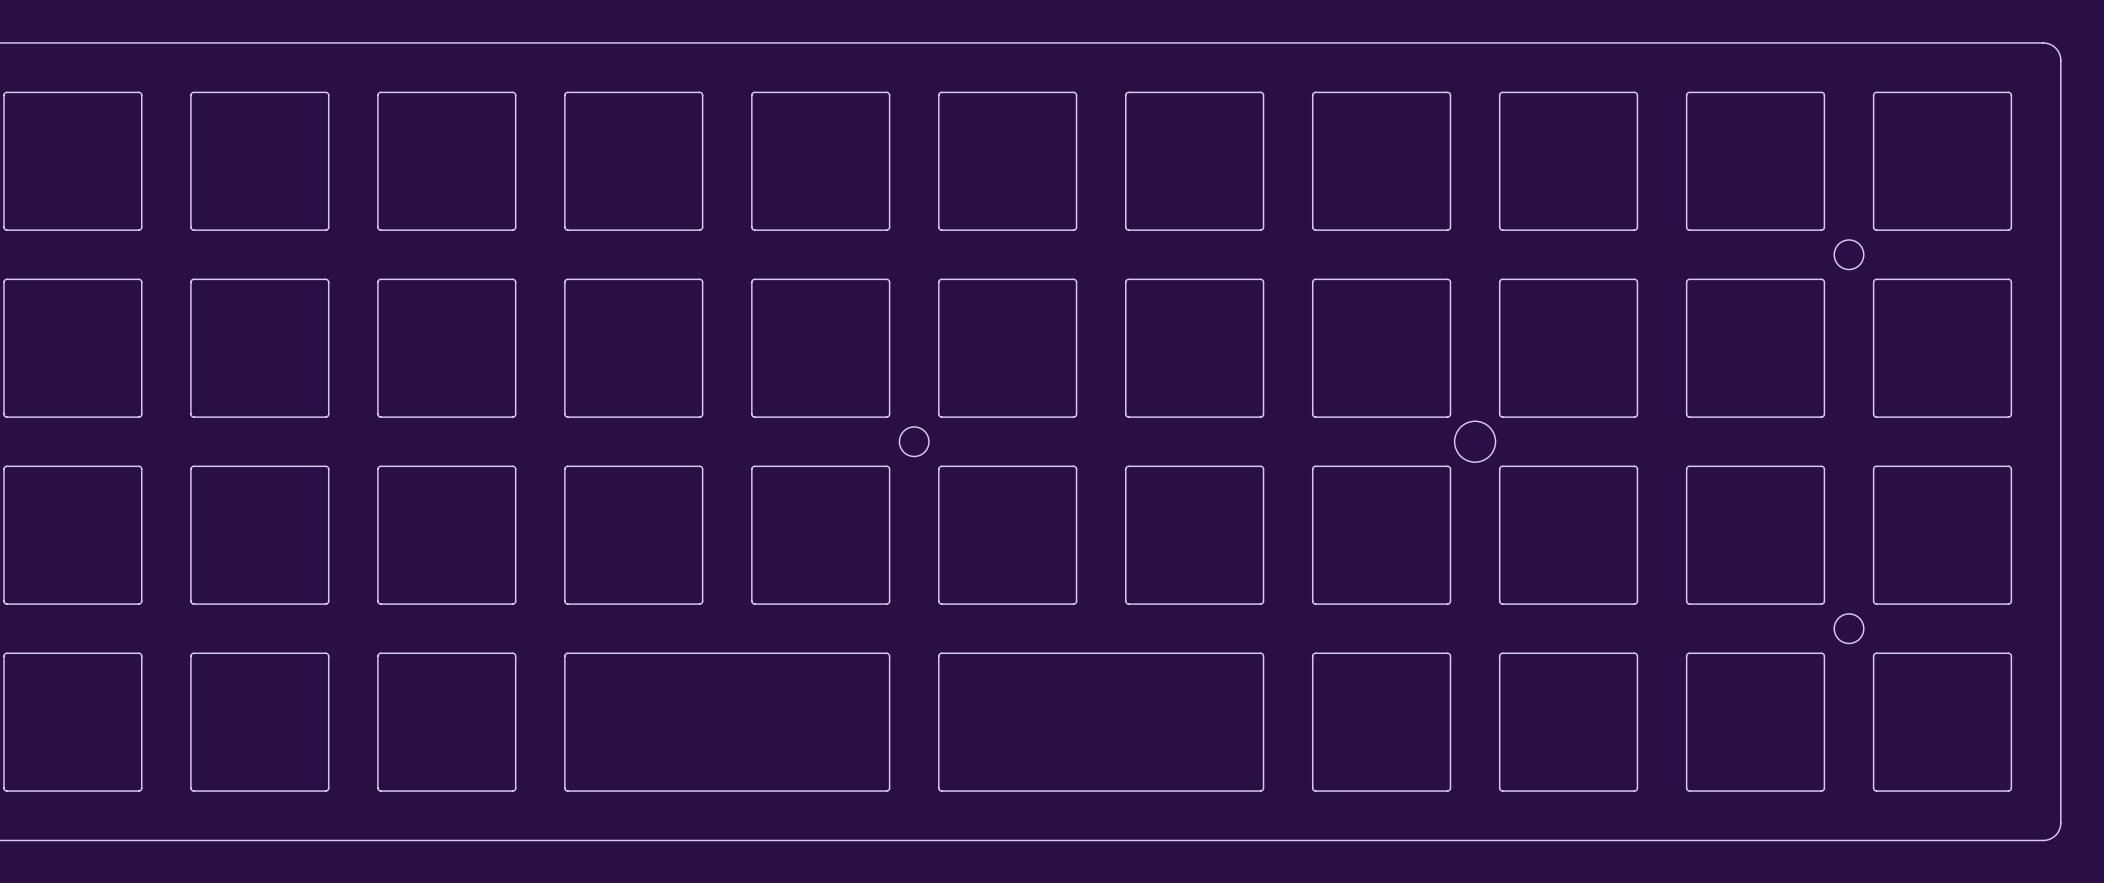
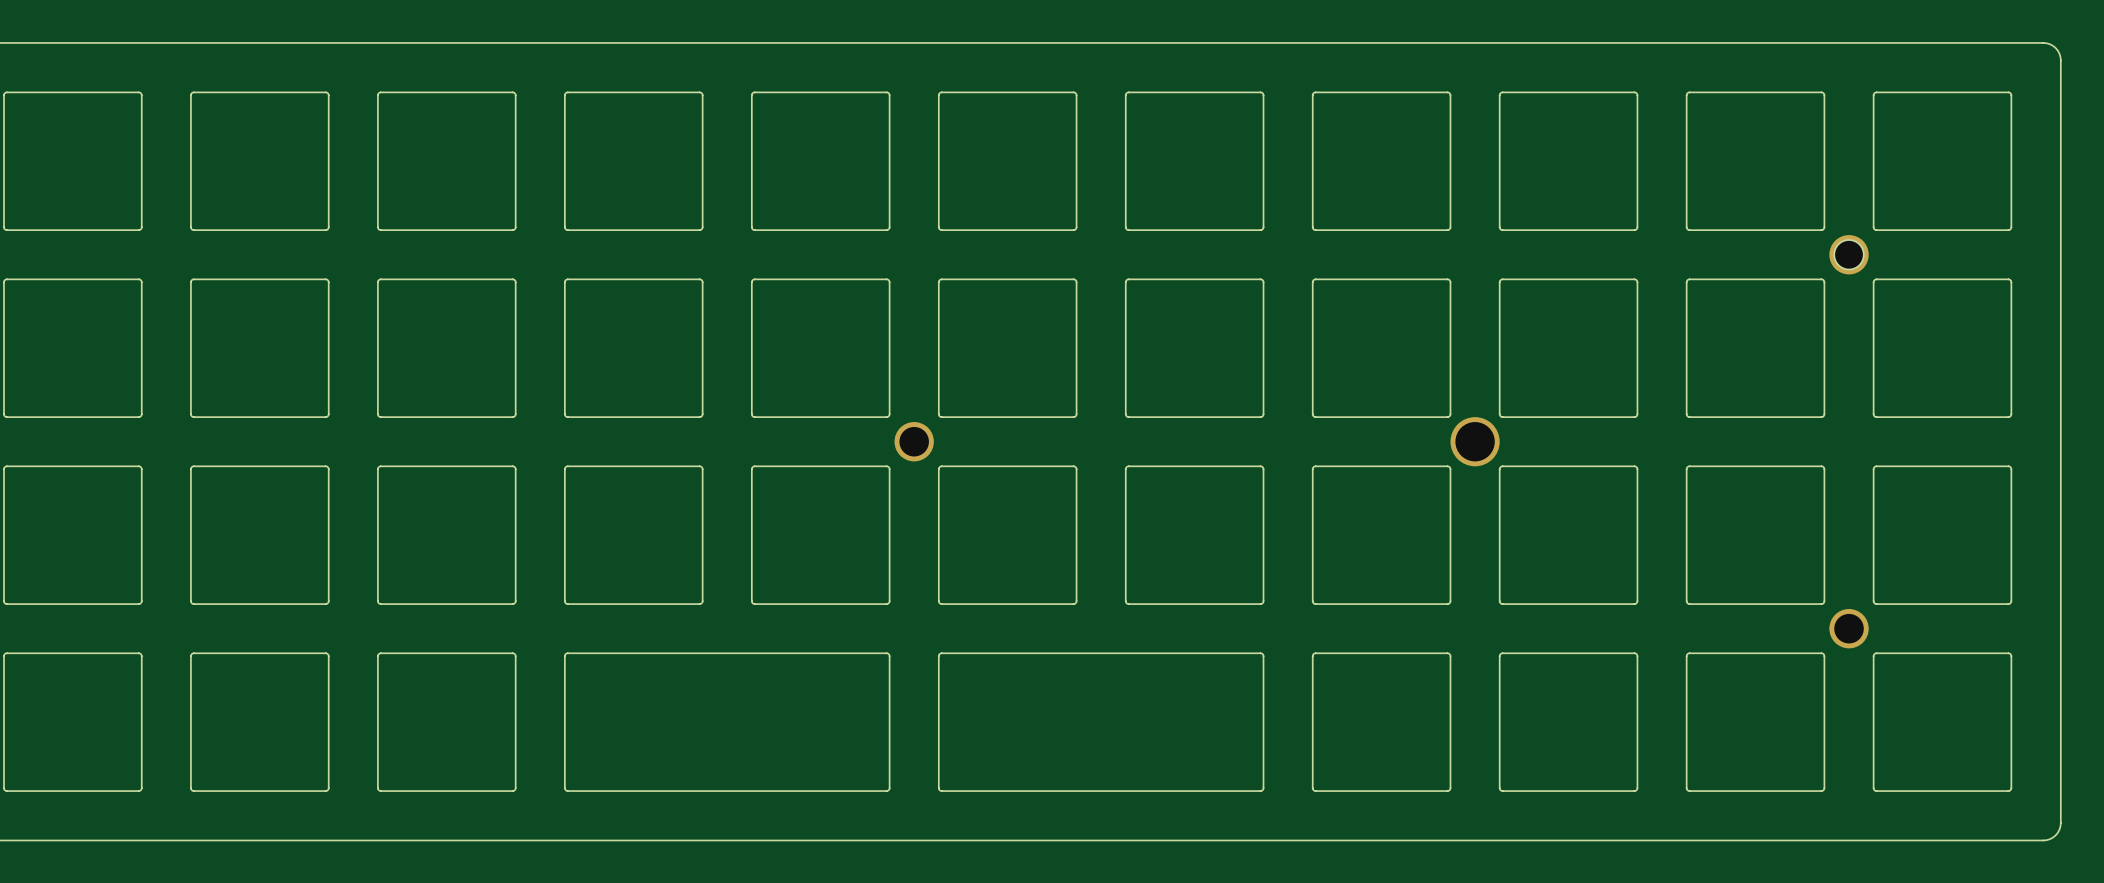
via: none -> (1849, 254)
round board edge: [1453, 420, 1497, 463] -> none
round board edge: [898, 426, 930, 458] -> none
via: none -> (914, 441)
via: none -> (1475, 441)
round board edge: [1833, 613, 1865, 645] -> none
via: none -> (1849, 628)

